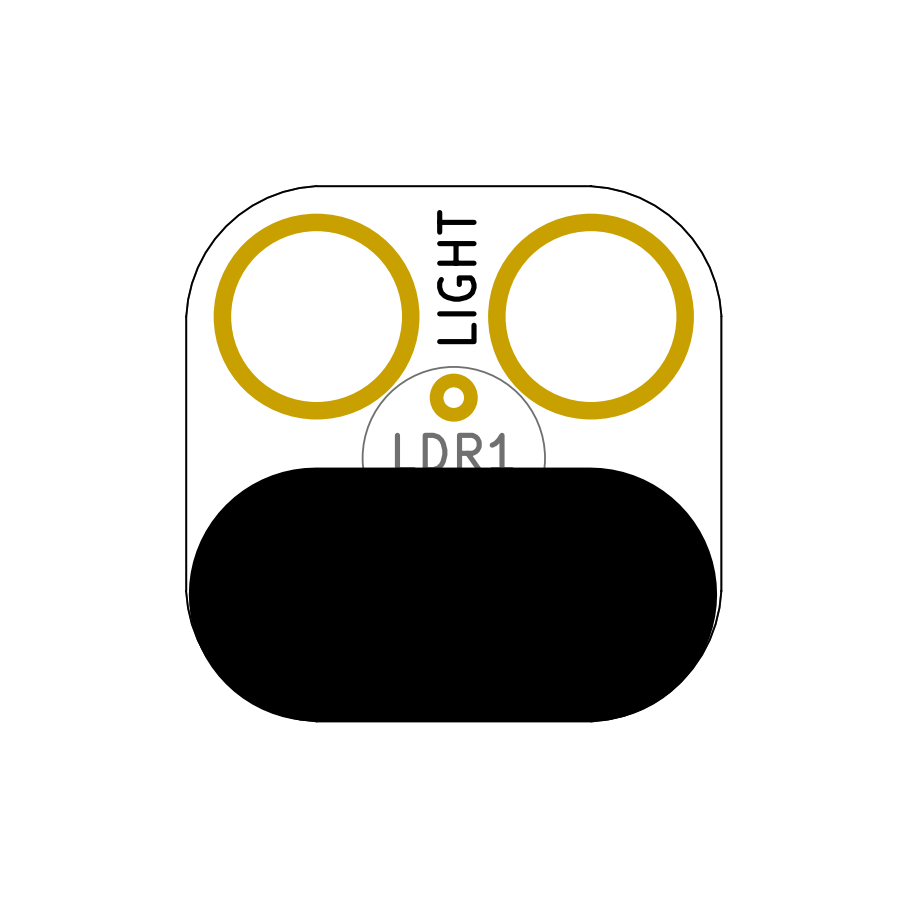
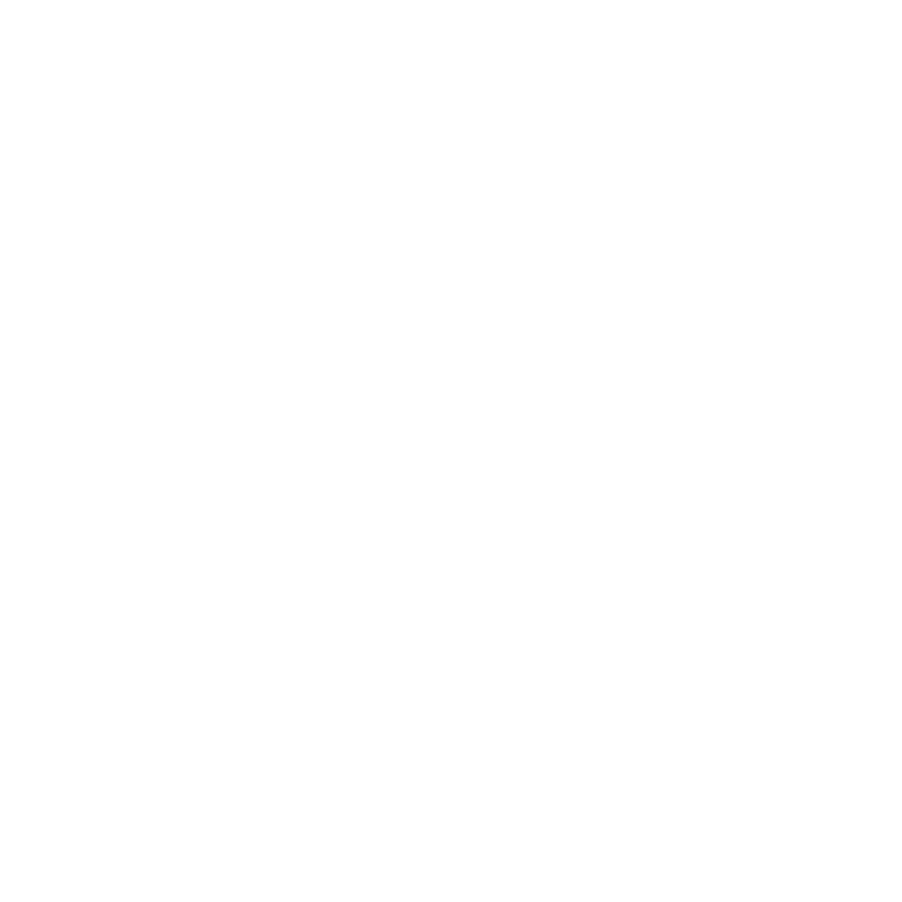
LDR1: (453, 453) -> none

